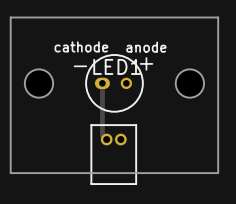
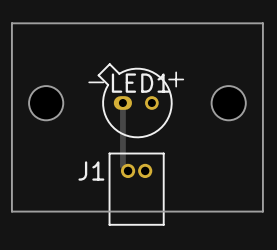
text: cathode (81, 46) -> none
text: anode (146, 47) -> none
LED1 footprint: [85, 54, 144, 113] -> [97, 63, 173, 139]
J1 name: none -> J1 (91, 171)

